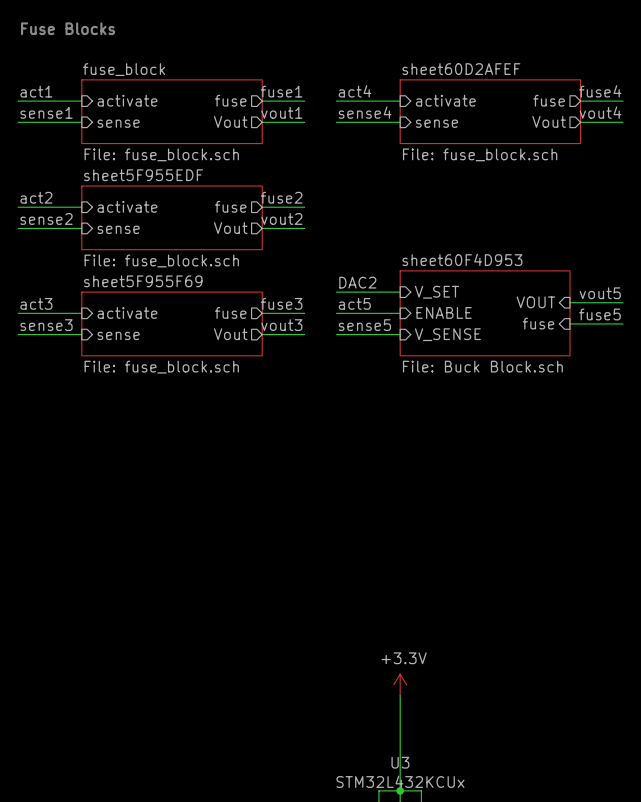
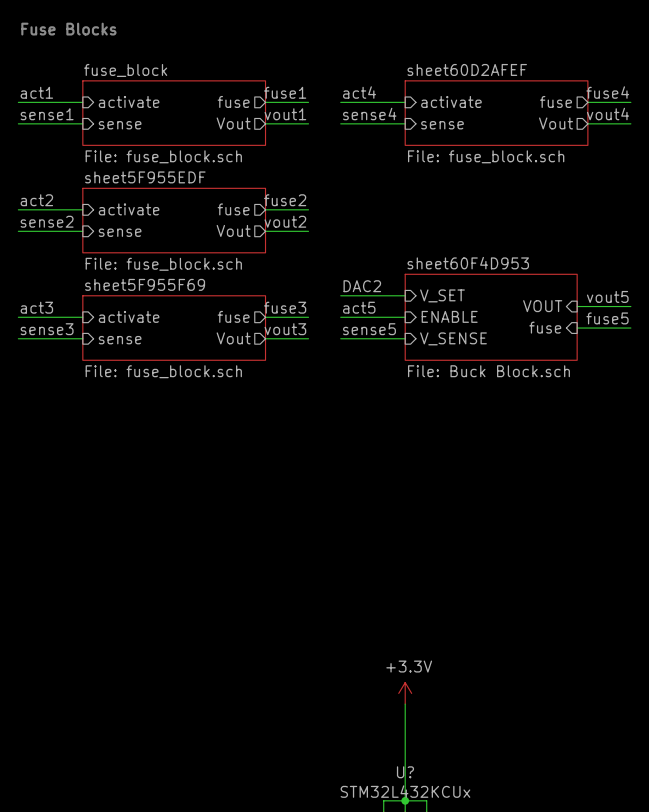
U3 name: U3 (400, 762) -> U? (405, 772)

